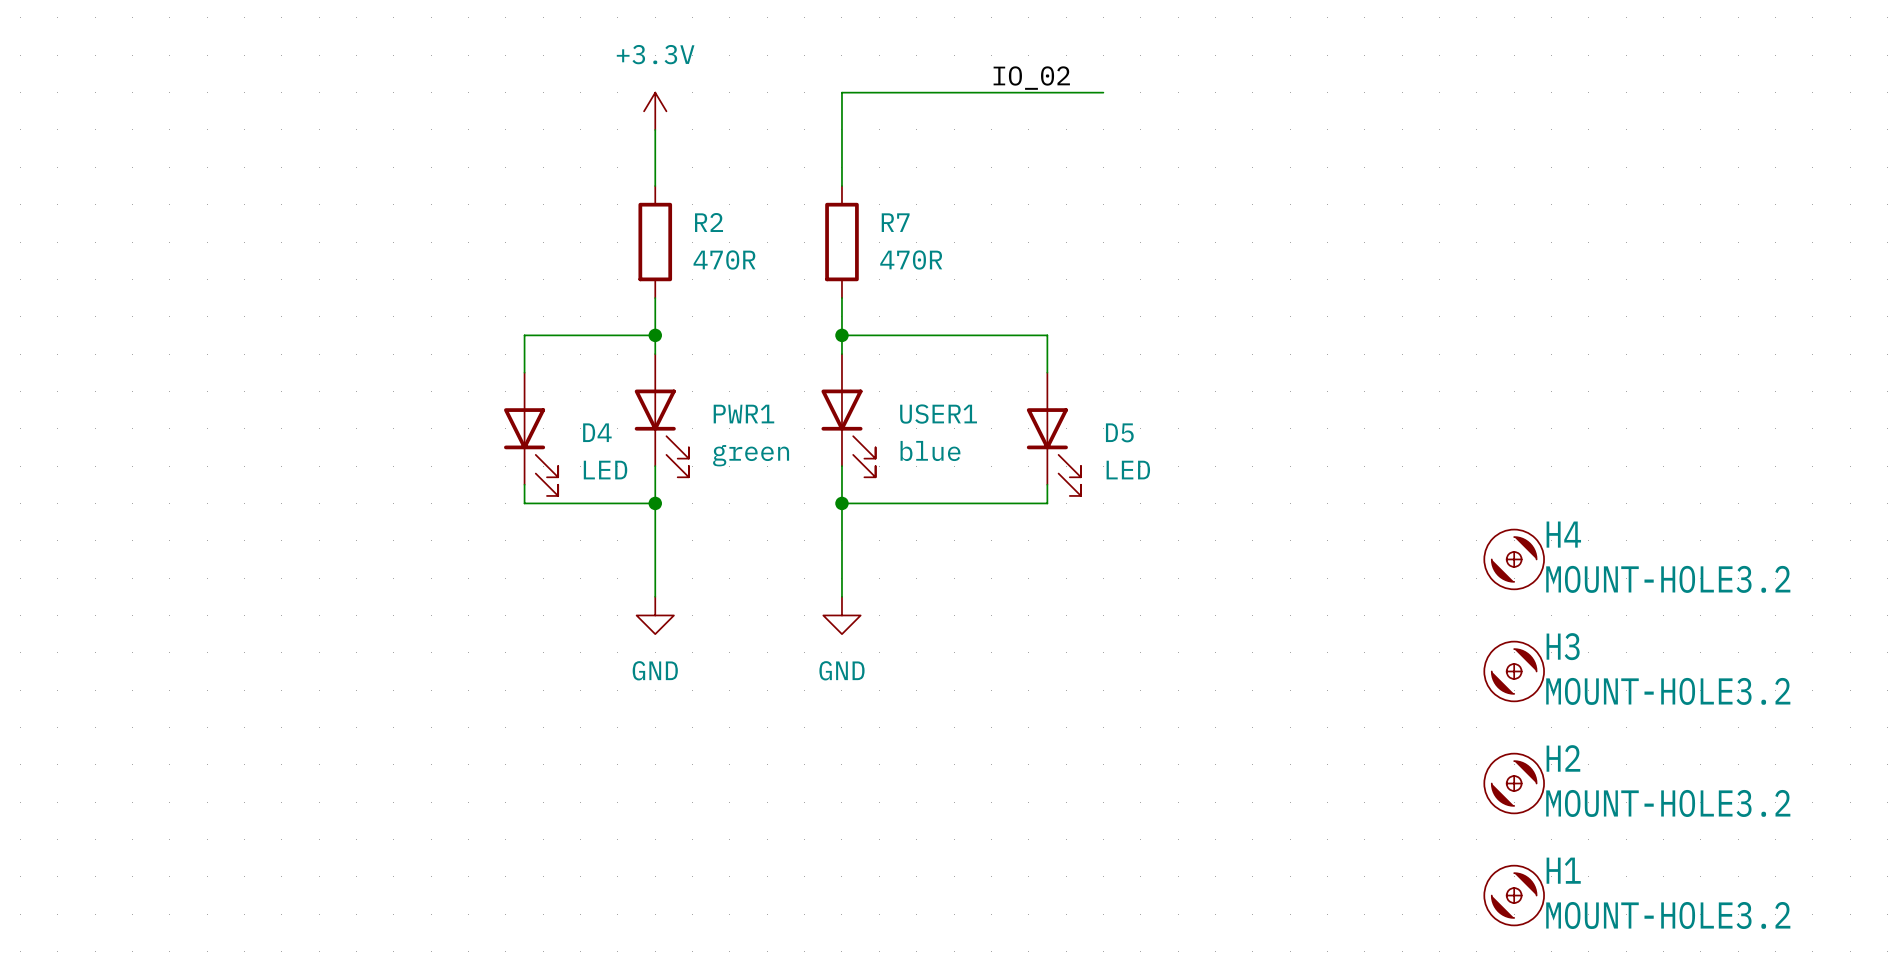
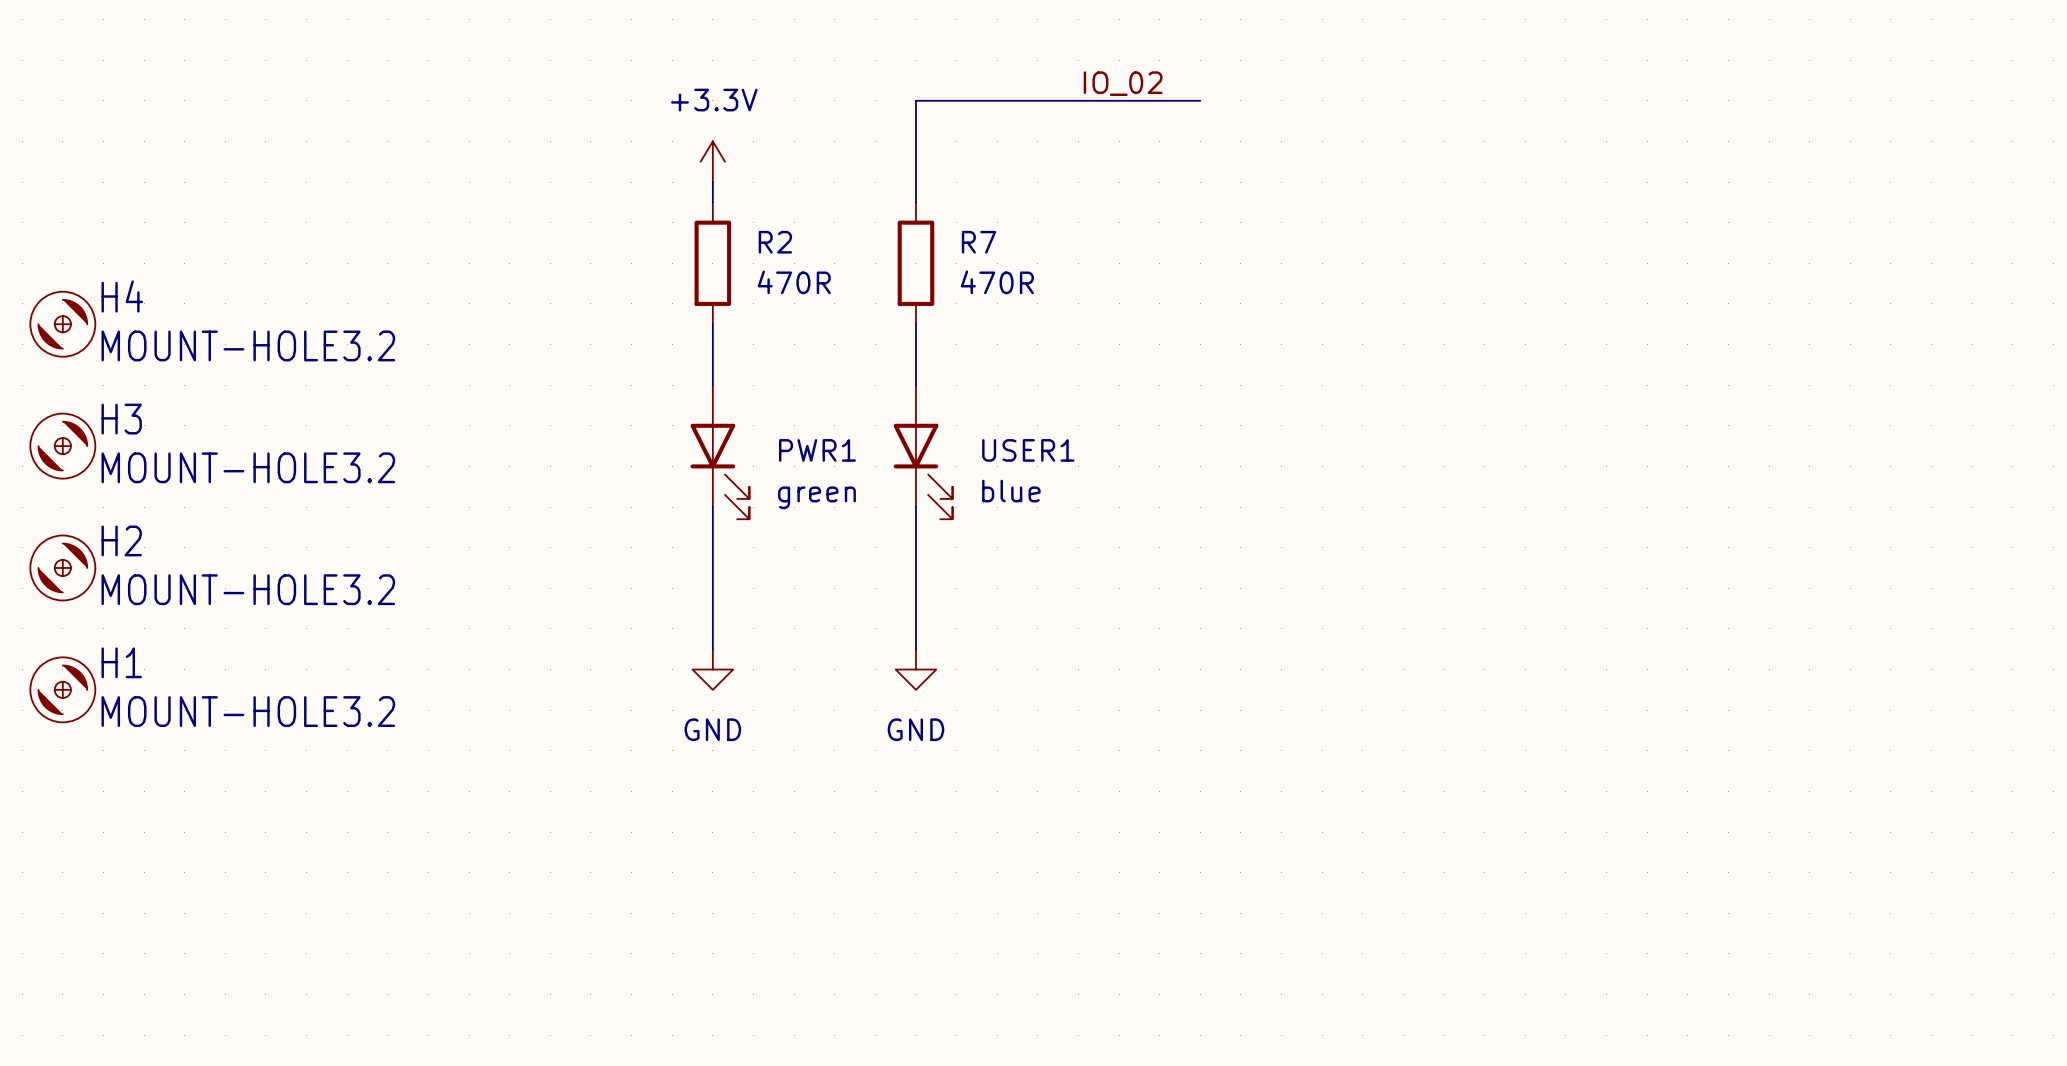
power symbol position: +3.3V (655, 111) -> +3.3V (712, 161)
wire: (655, 335) (524, 335) (524, 372) -> none
junction: (655, 335) -> none
wire: (841, 335) (1047, 335) (1047, 372) -> none
junction: (841, 335) -> none
D4: LED (531, 434) -> none
D5: LED (1053, 434) -> none
wire: (524, 484) (524, 503) (655, 503) -> none
wire: (1047, 484) (1047, 503) (841, 503) -> none
junction: (655, 503) -> none
junction: (841, 503) -> none
H4 position: (1514, 559) -> (62, 324)
H3 position: (1514, 671) -> (62, 446)
H2 position: (1514, 783) -> (62, 567)
H1 position: (1514, 895) -> (62, 689)

